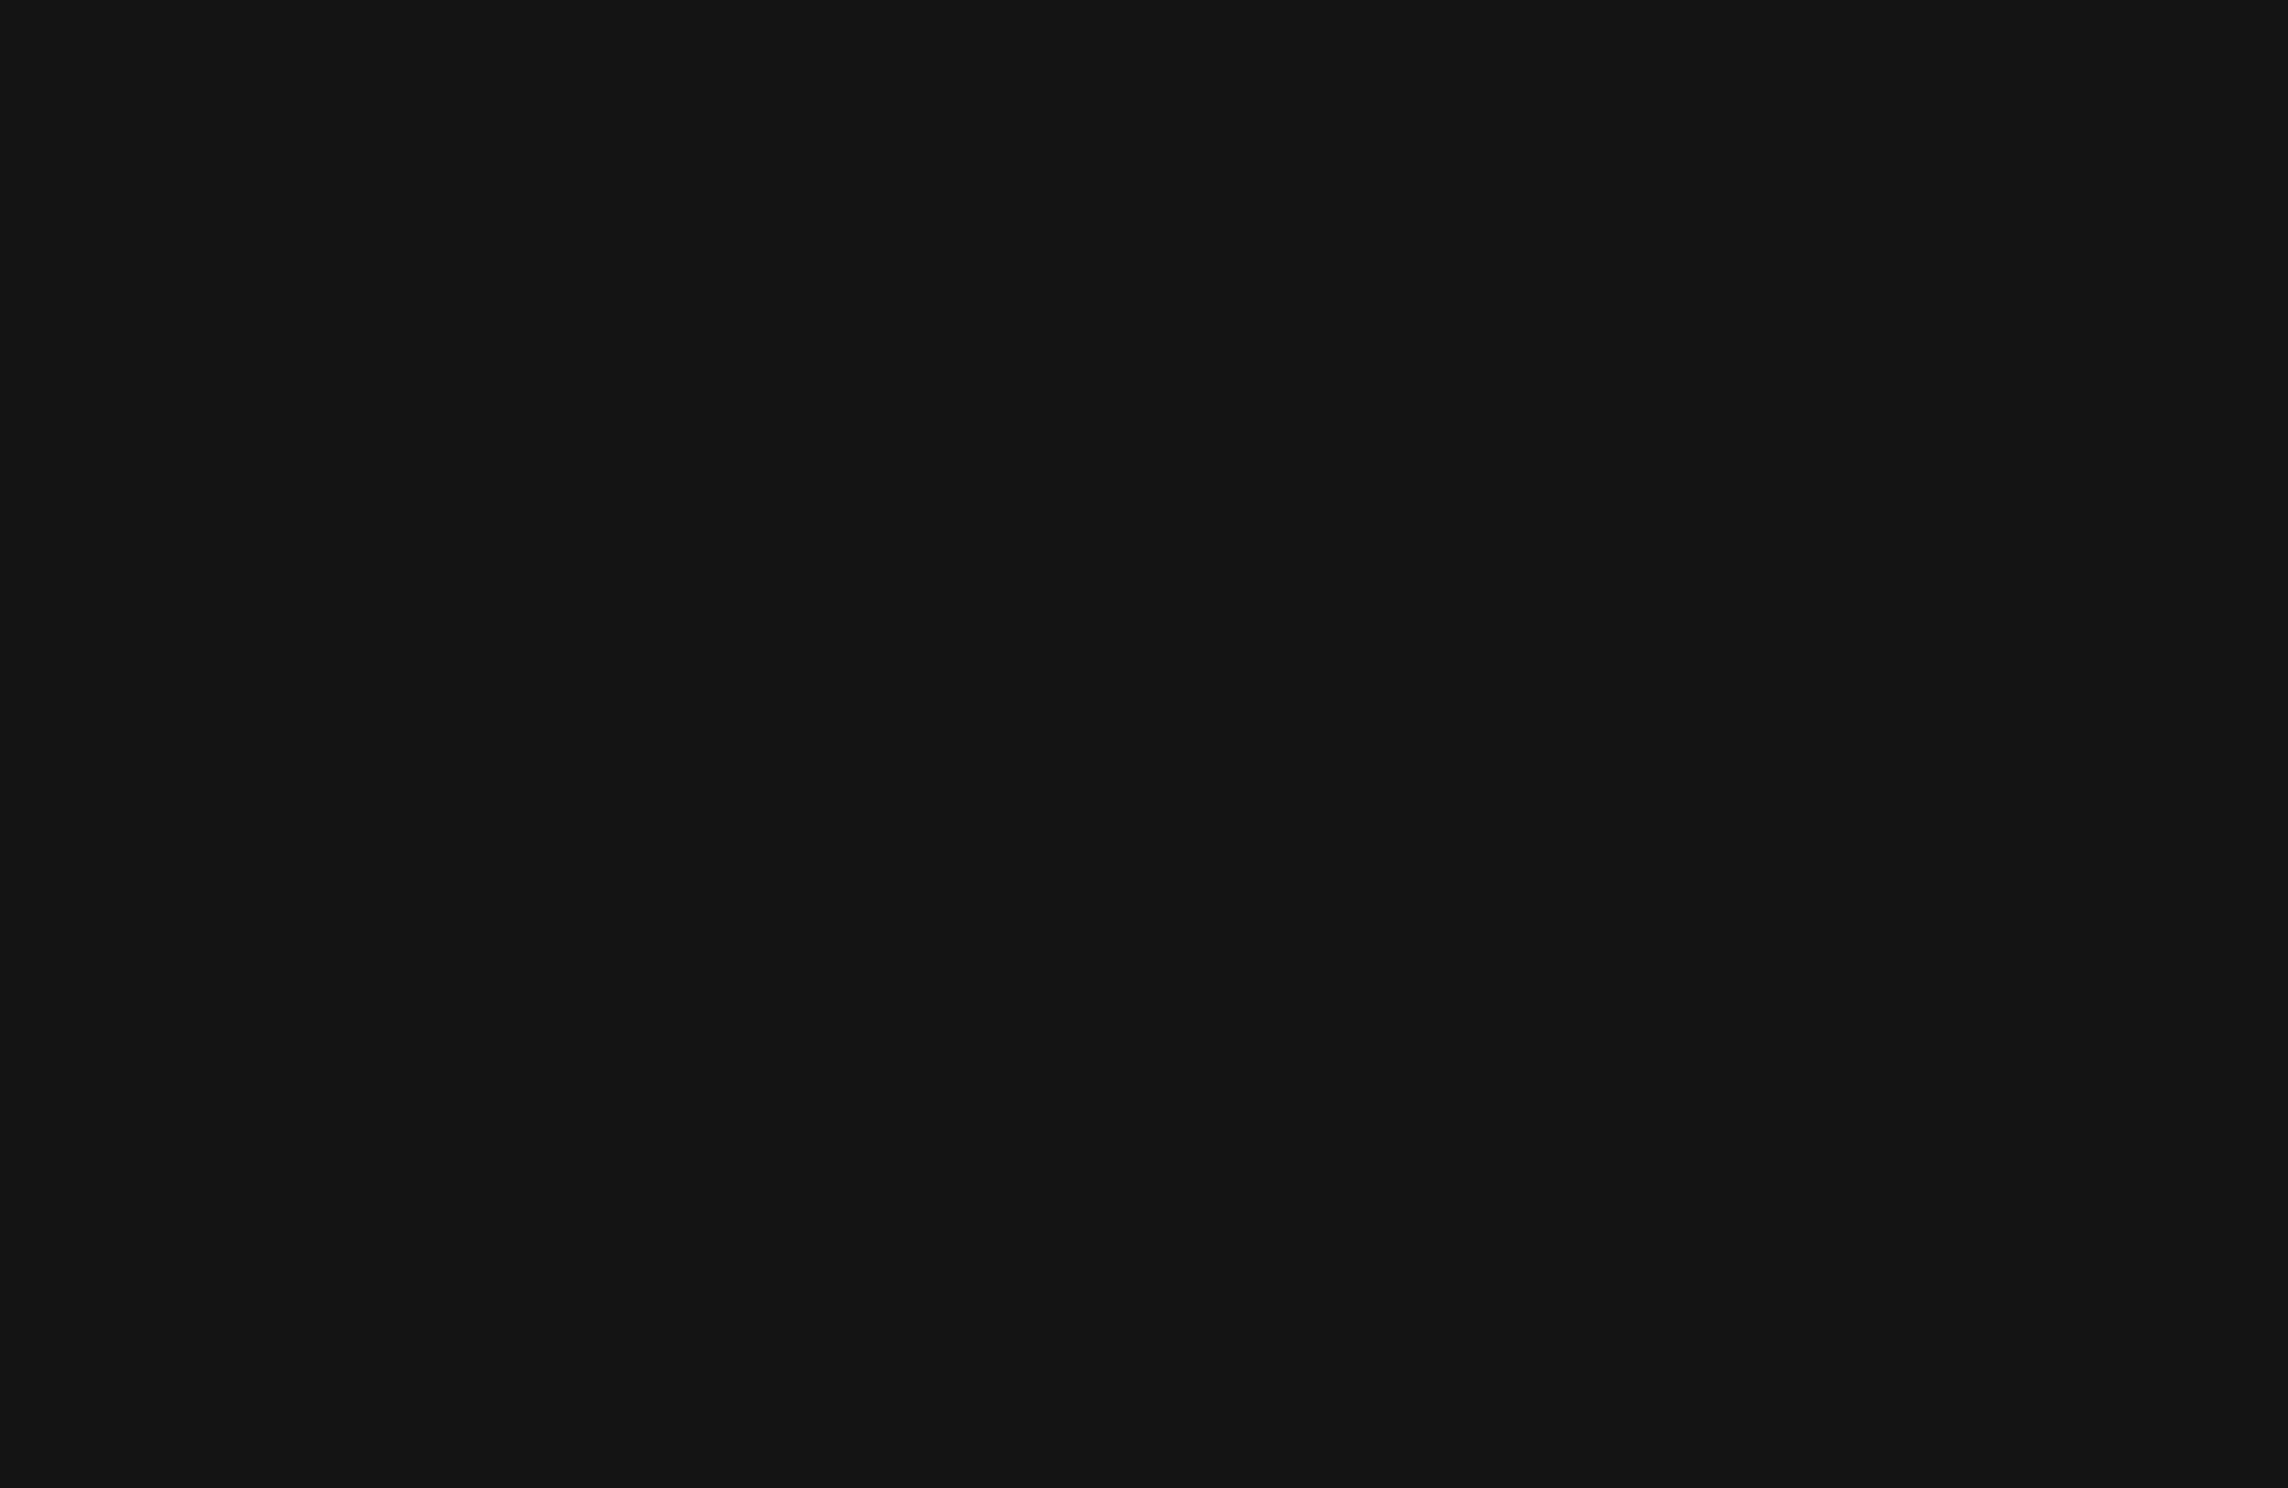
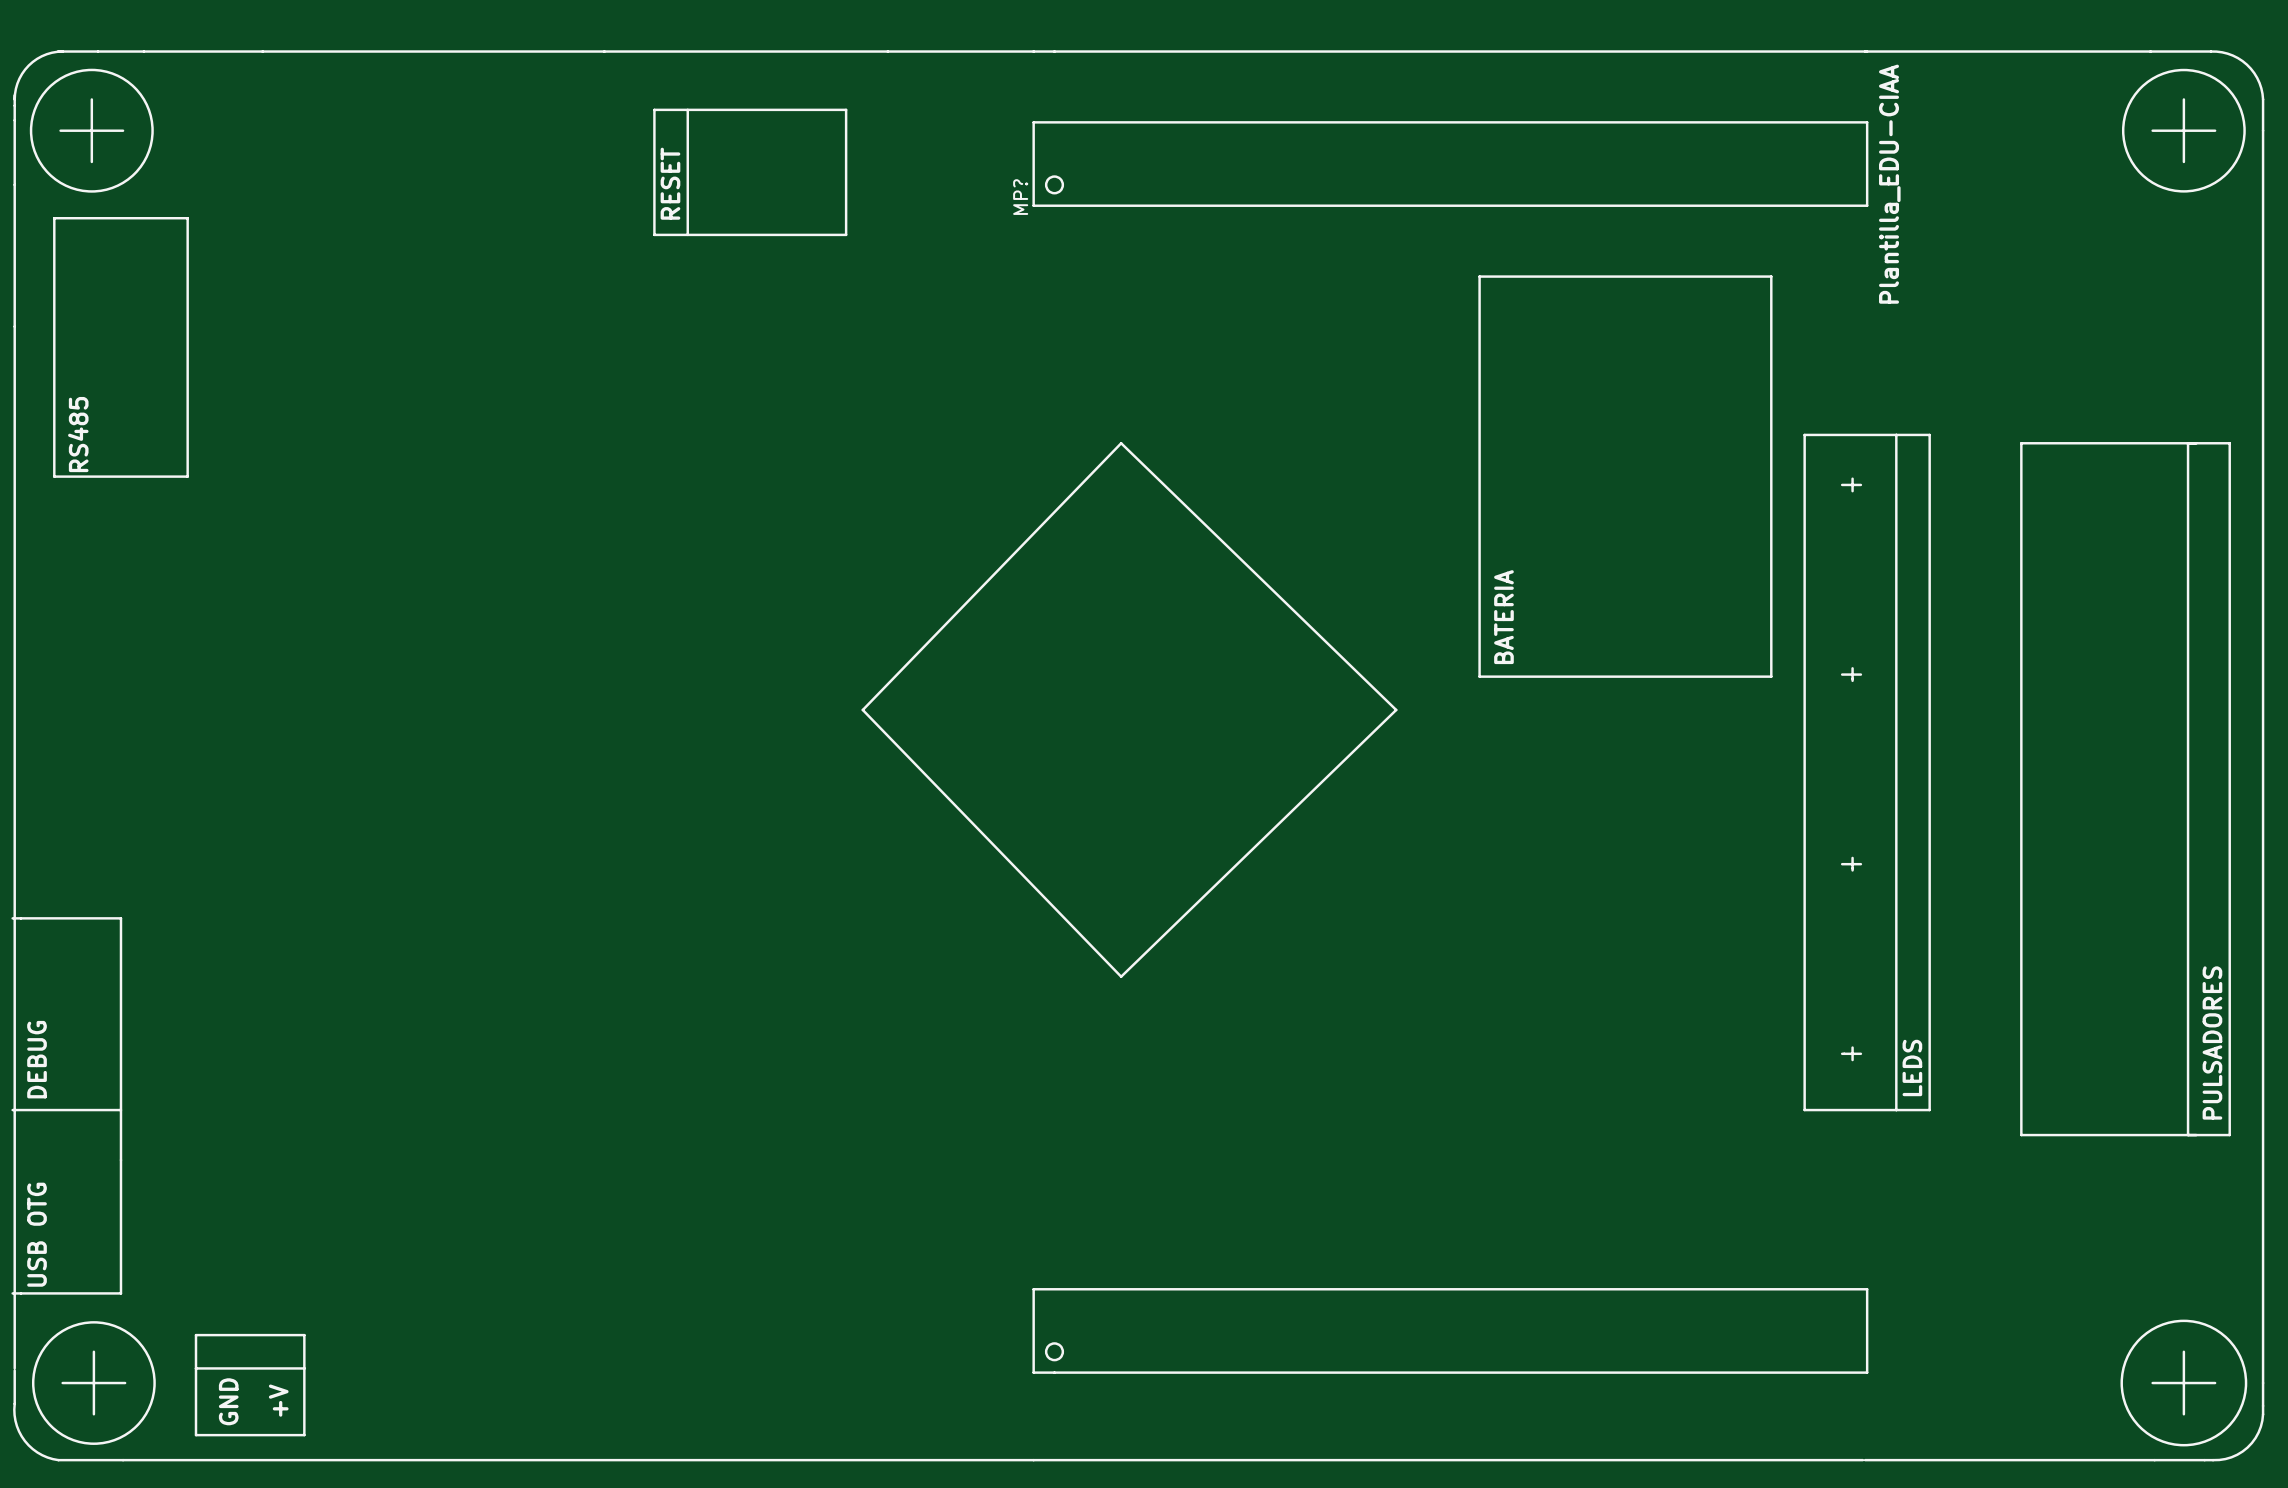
MP?: none -> Plantilla_EDU-CIAA (1137, 755)

